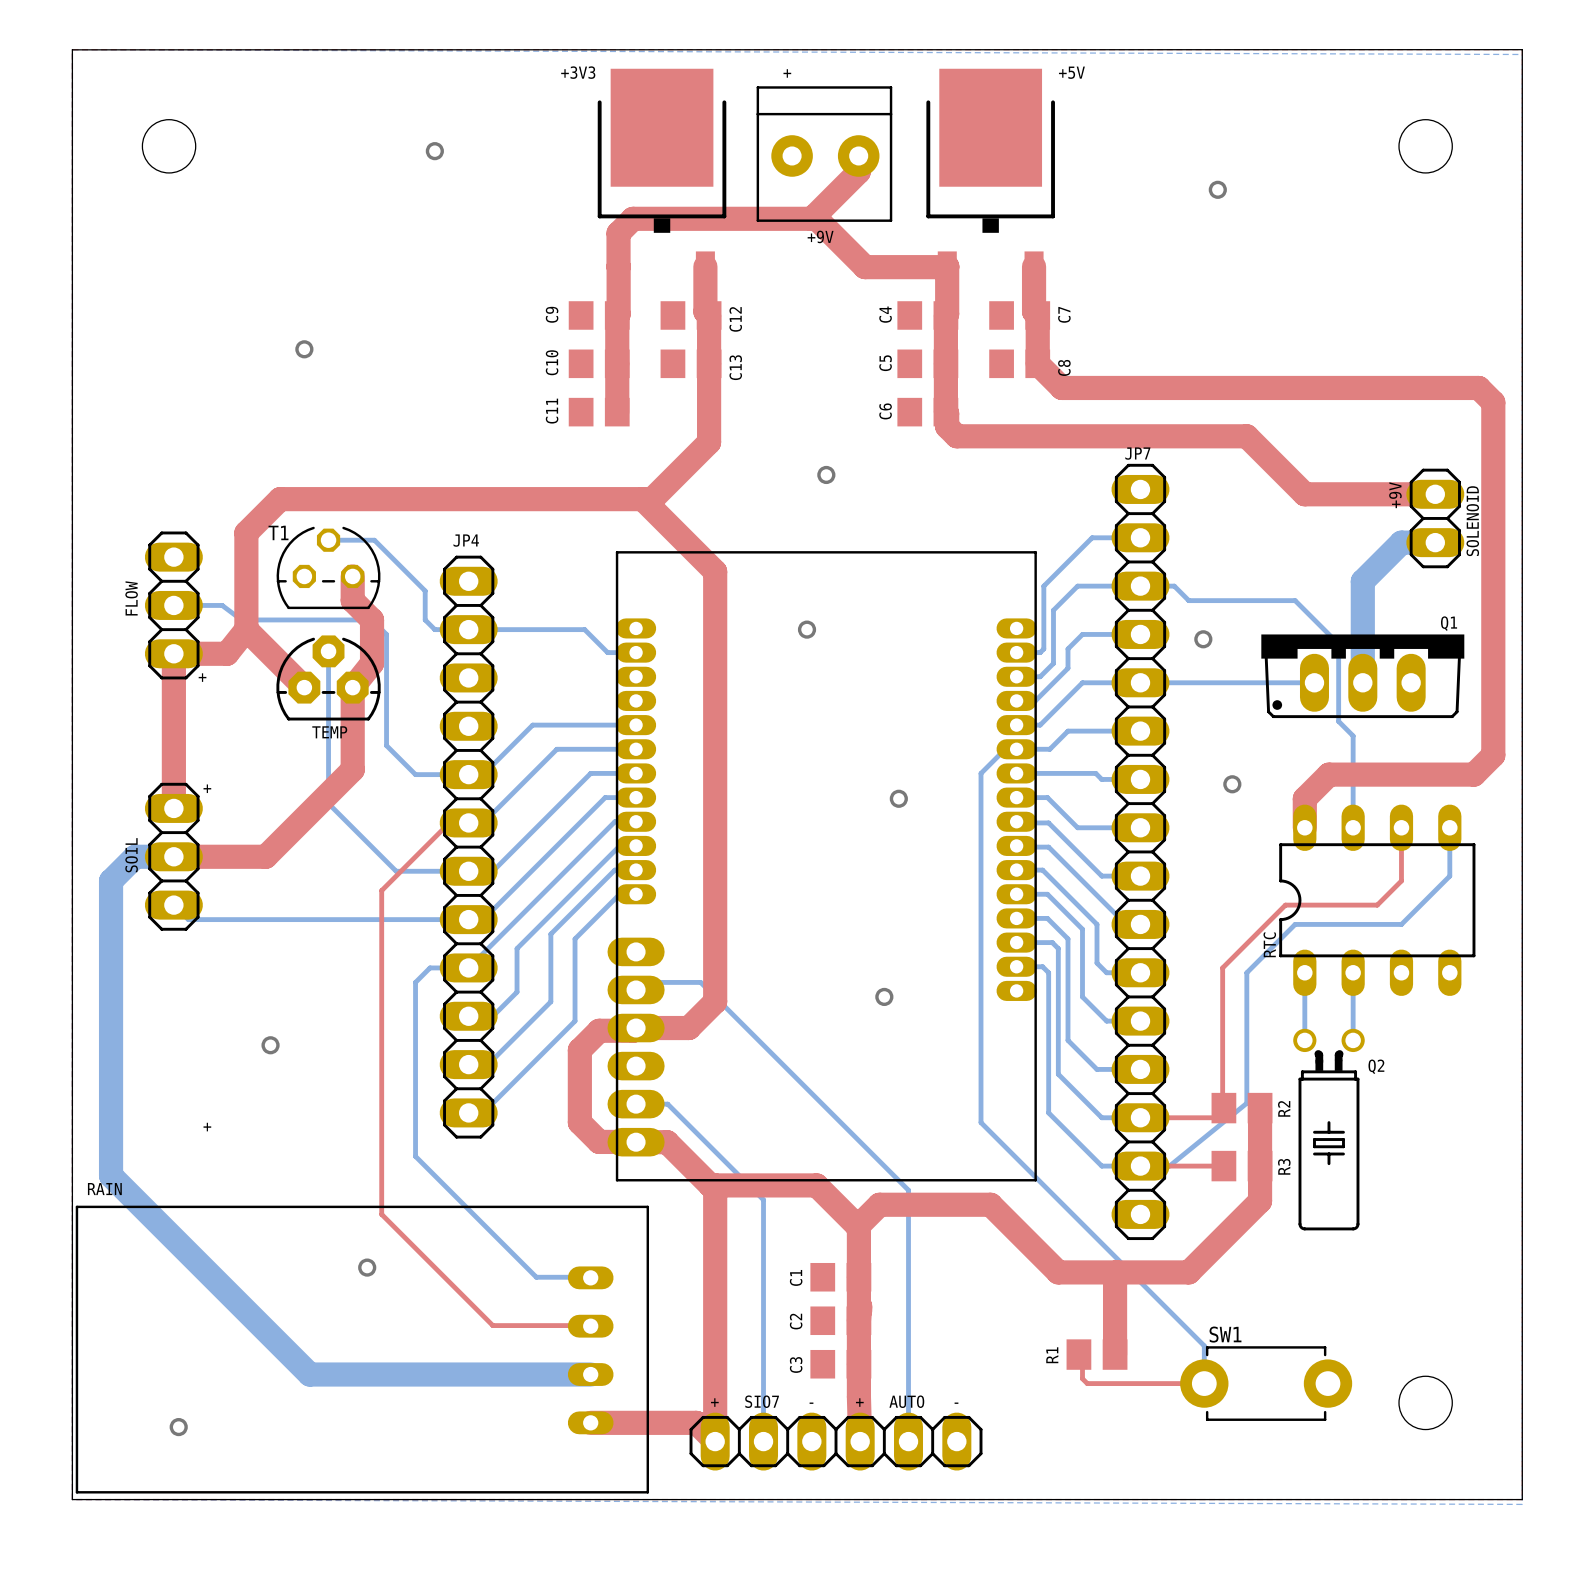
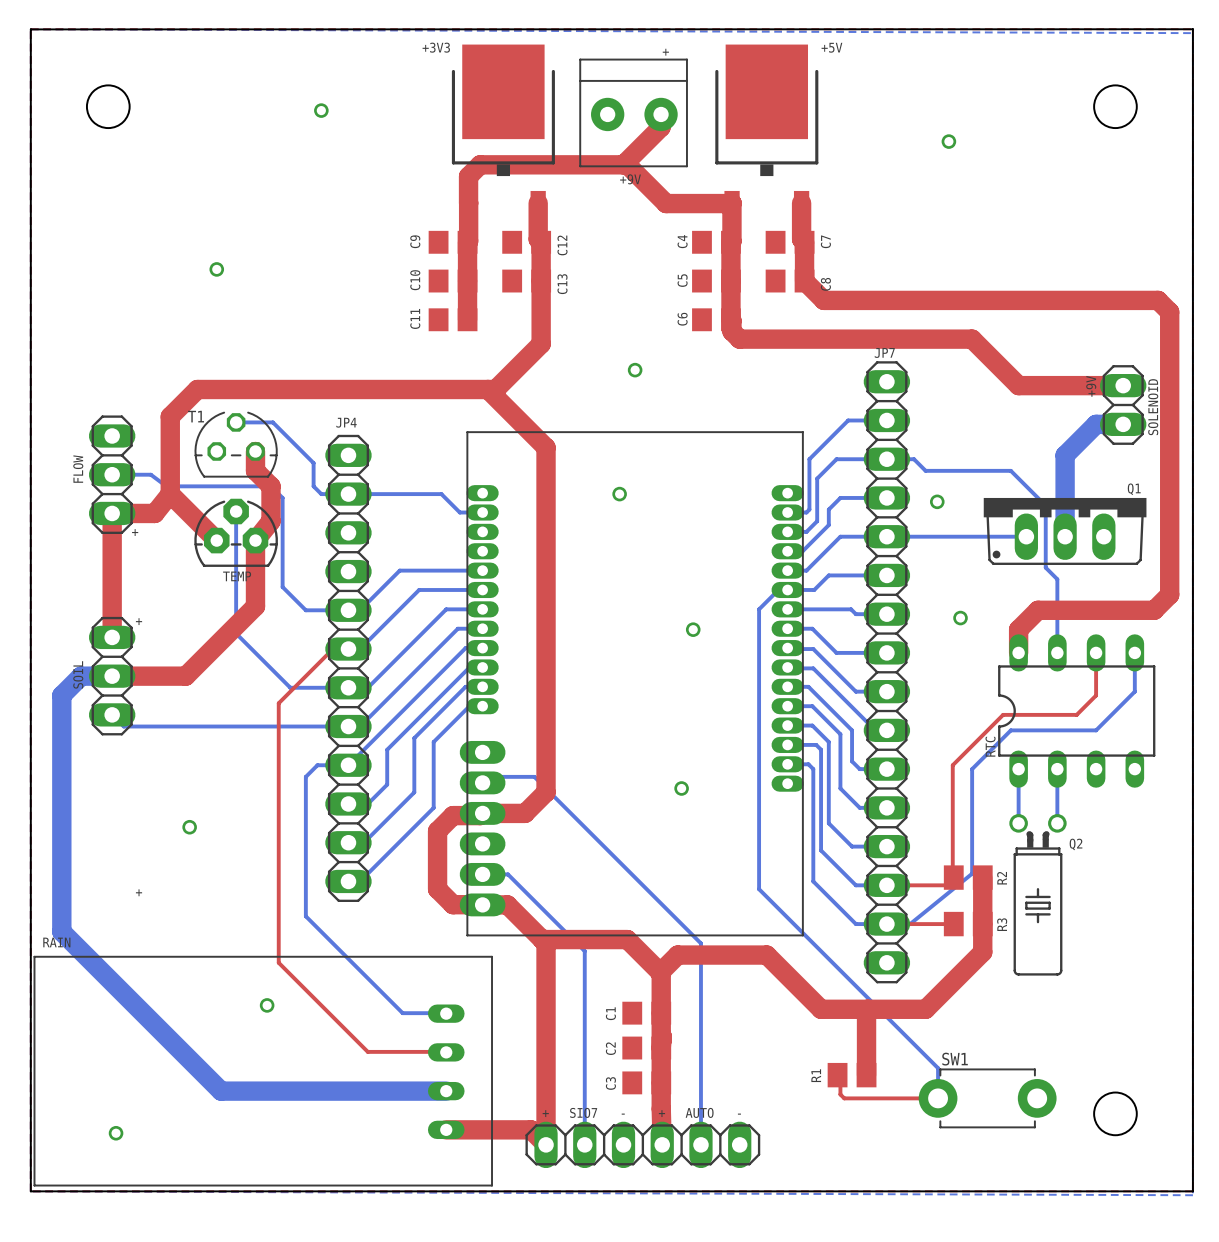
text position: + (787, 73) -> + (665, 52)

